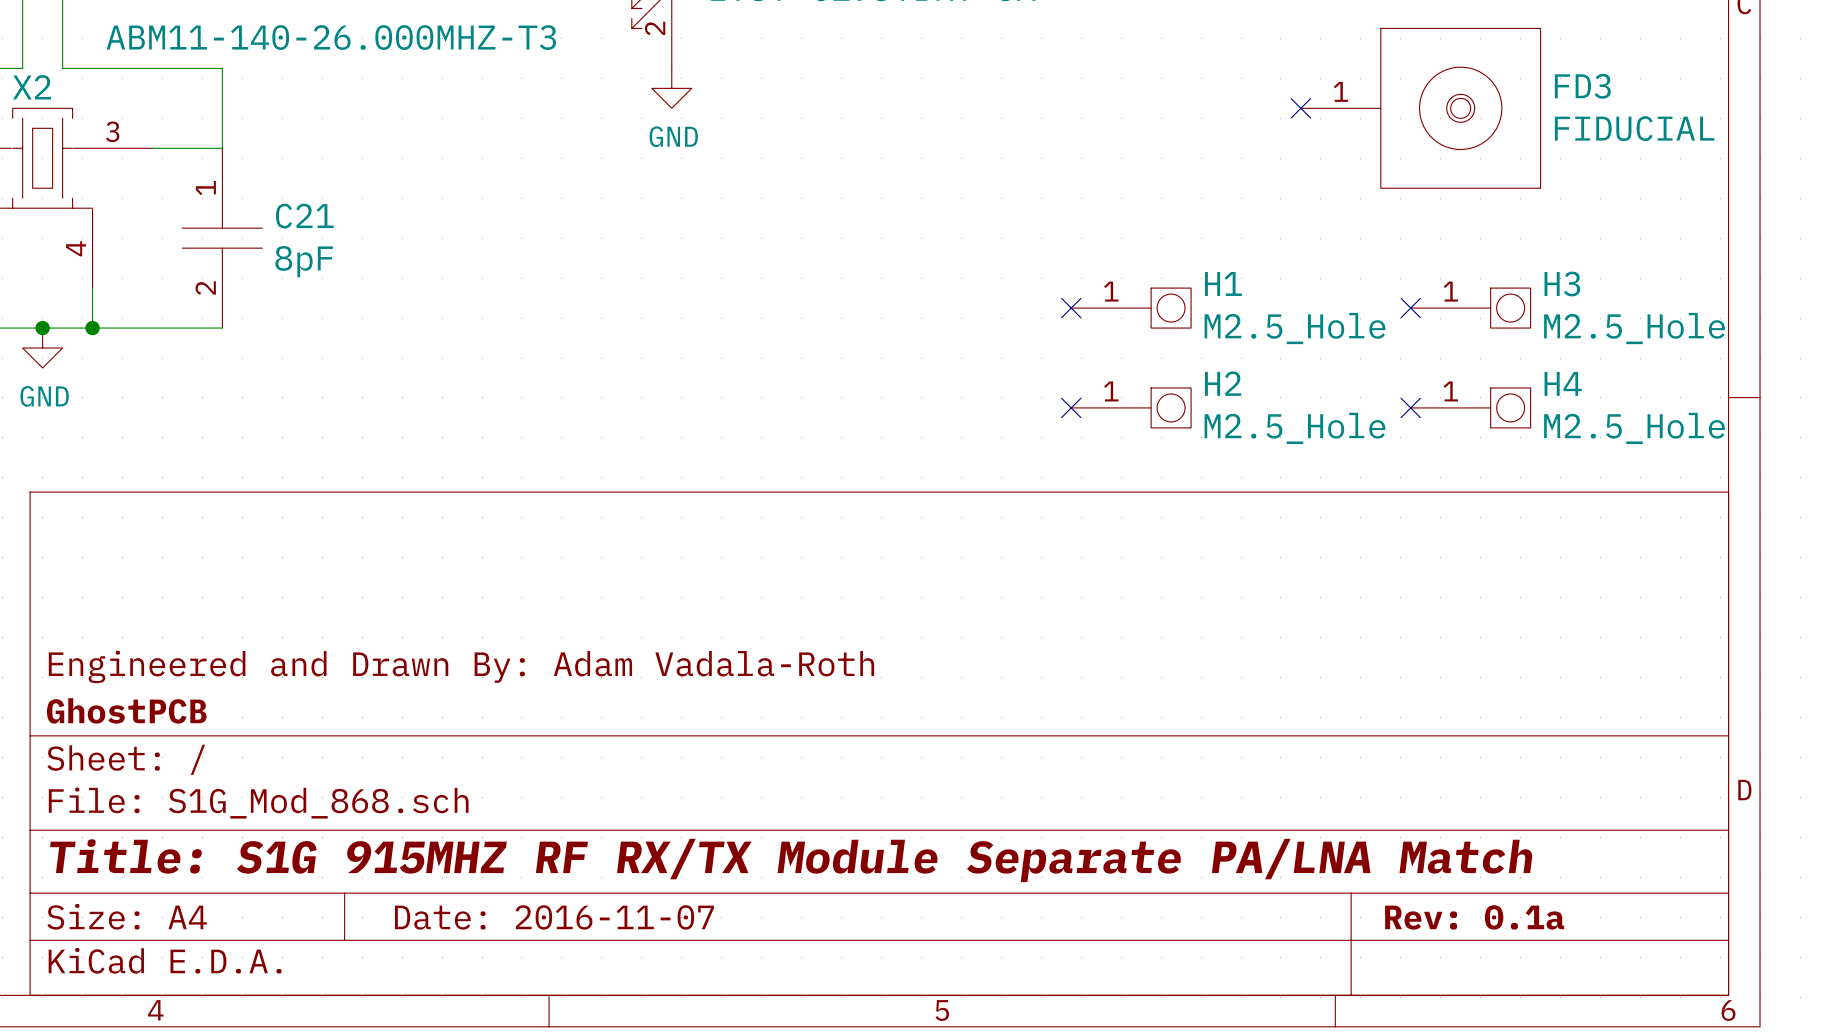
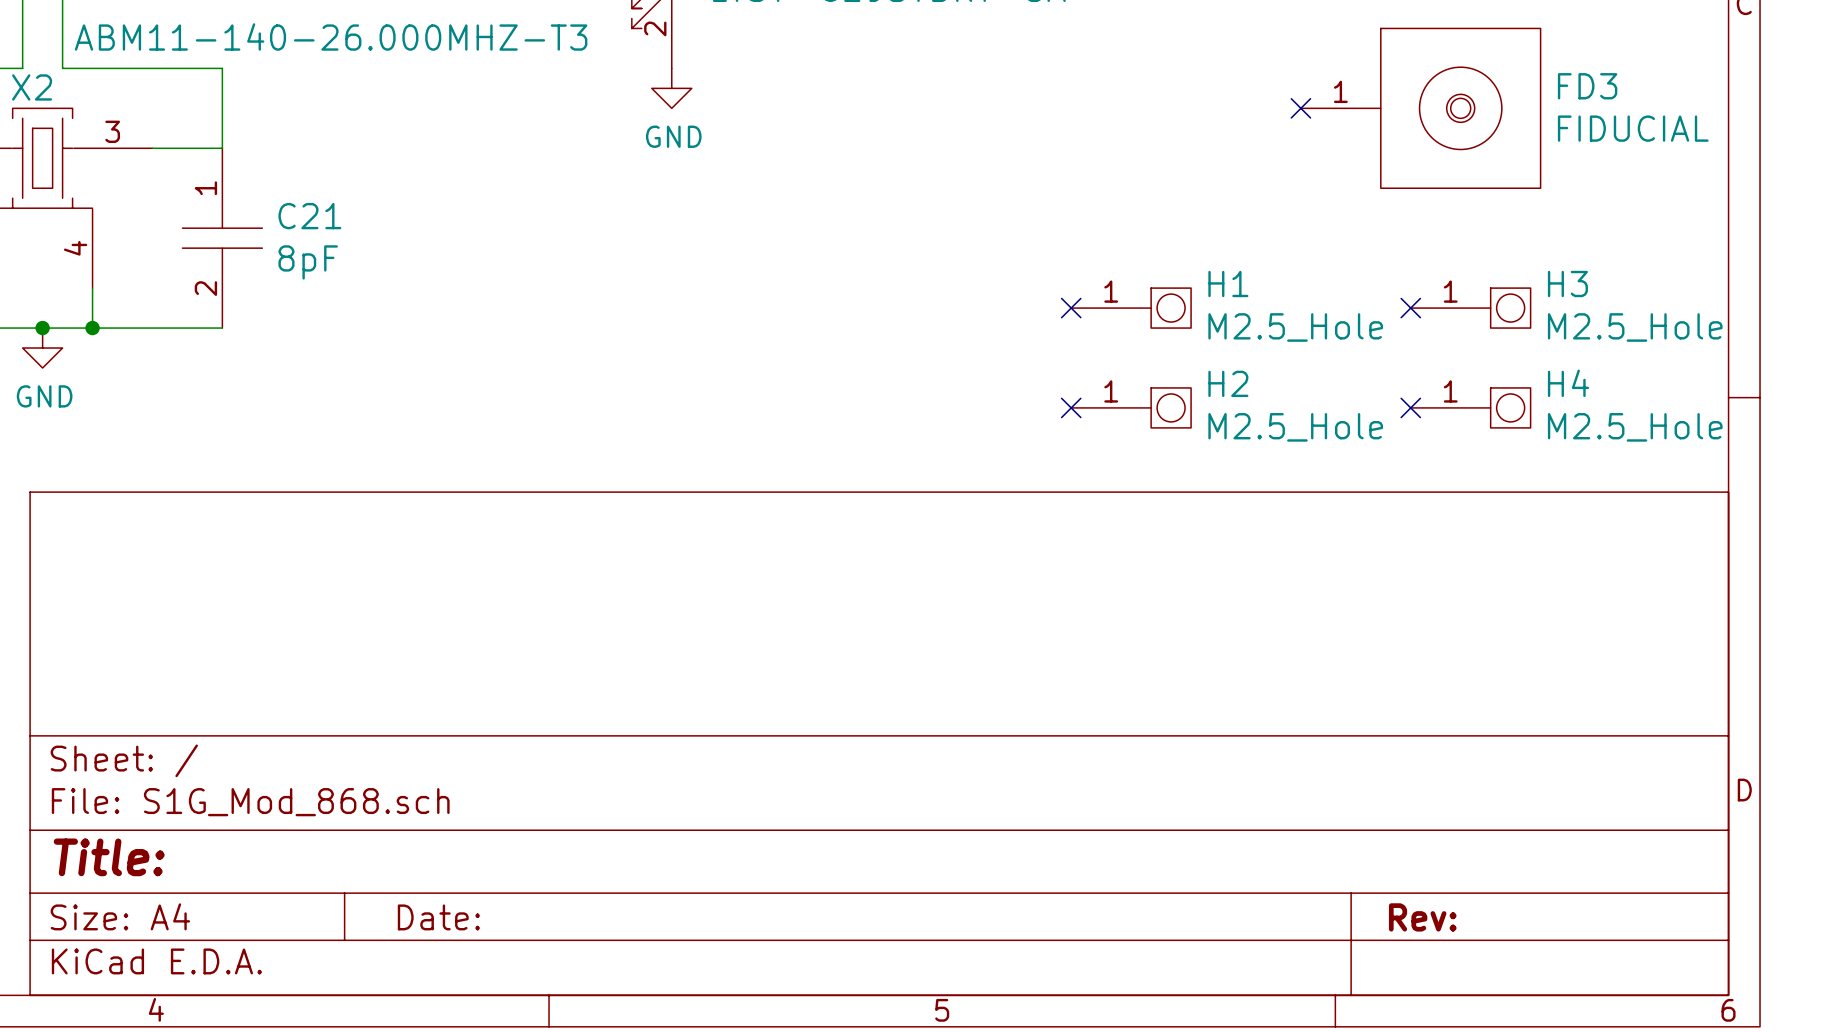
title block: Engineered and Drawn By: Adam Vadala-Roth (461, 666) -> none
title block: GhostPCB (126, 710) -> none
title block: Title: S1G 915MHZ RF RX/TX Module Separate PA/LNA Match (791, 860) -> Title: (109, 857)
title block: Date: 2016-11-07 (554, 917) -> Date: (438, 917)
title block: Rev: 0.1a (1474, 917) -> Rev: (1422, 917)

